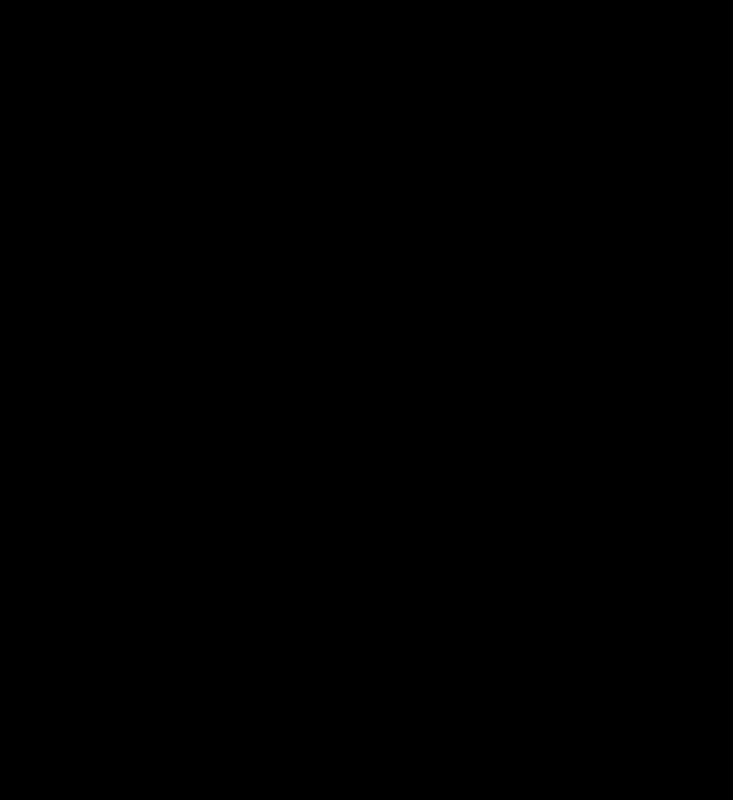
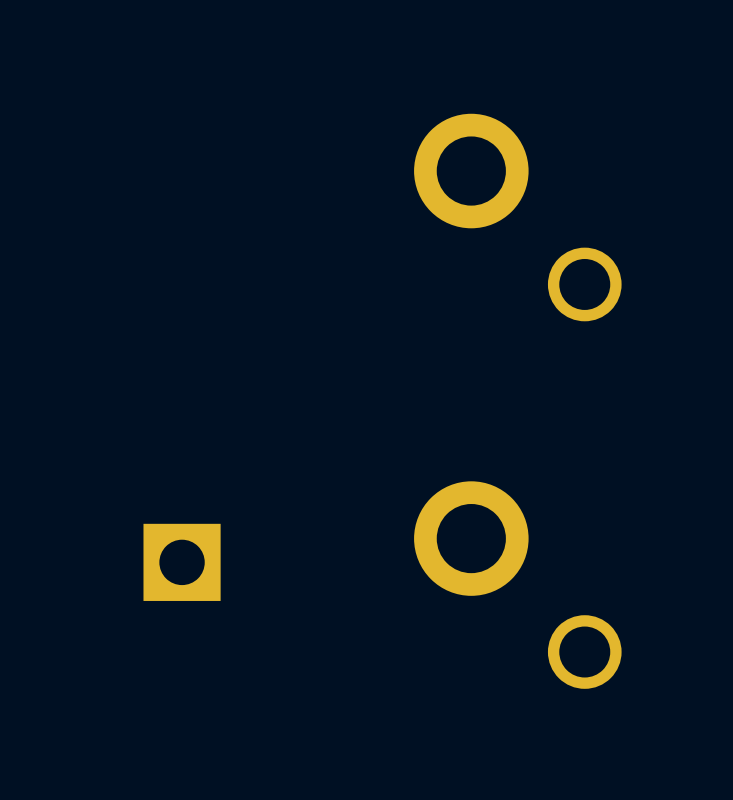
part: none -> (517, 217)
part: none -> (182, 562)
part: none -> (517, 585)

